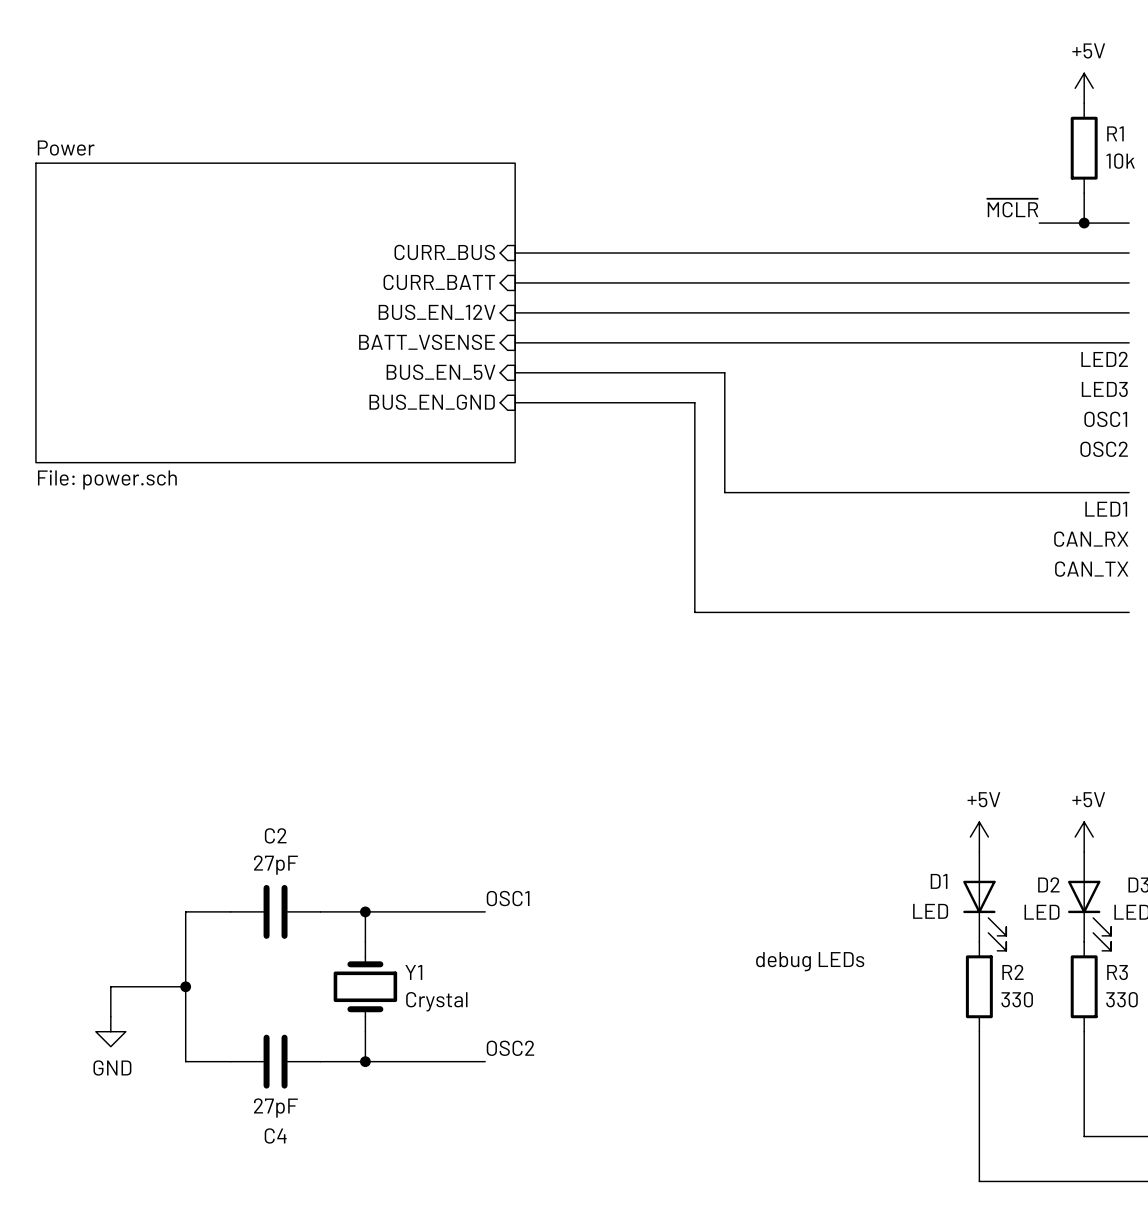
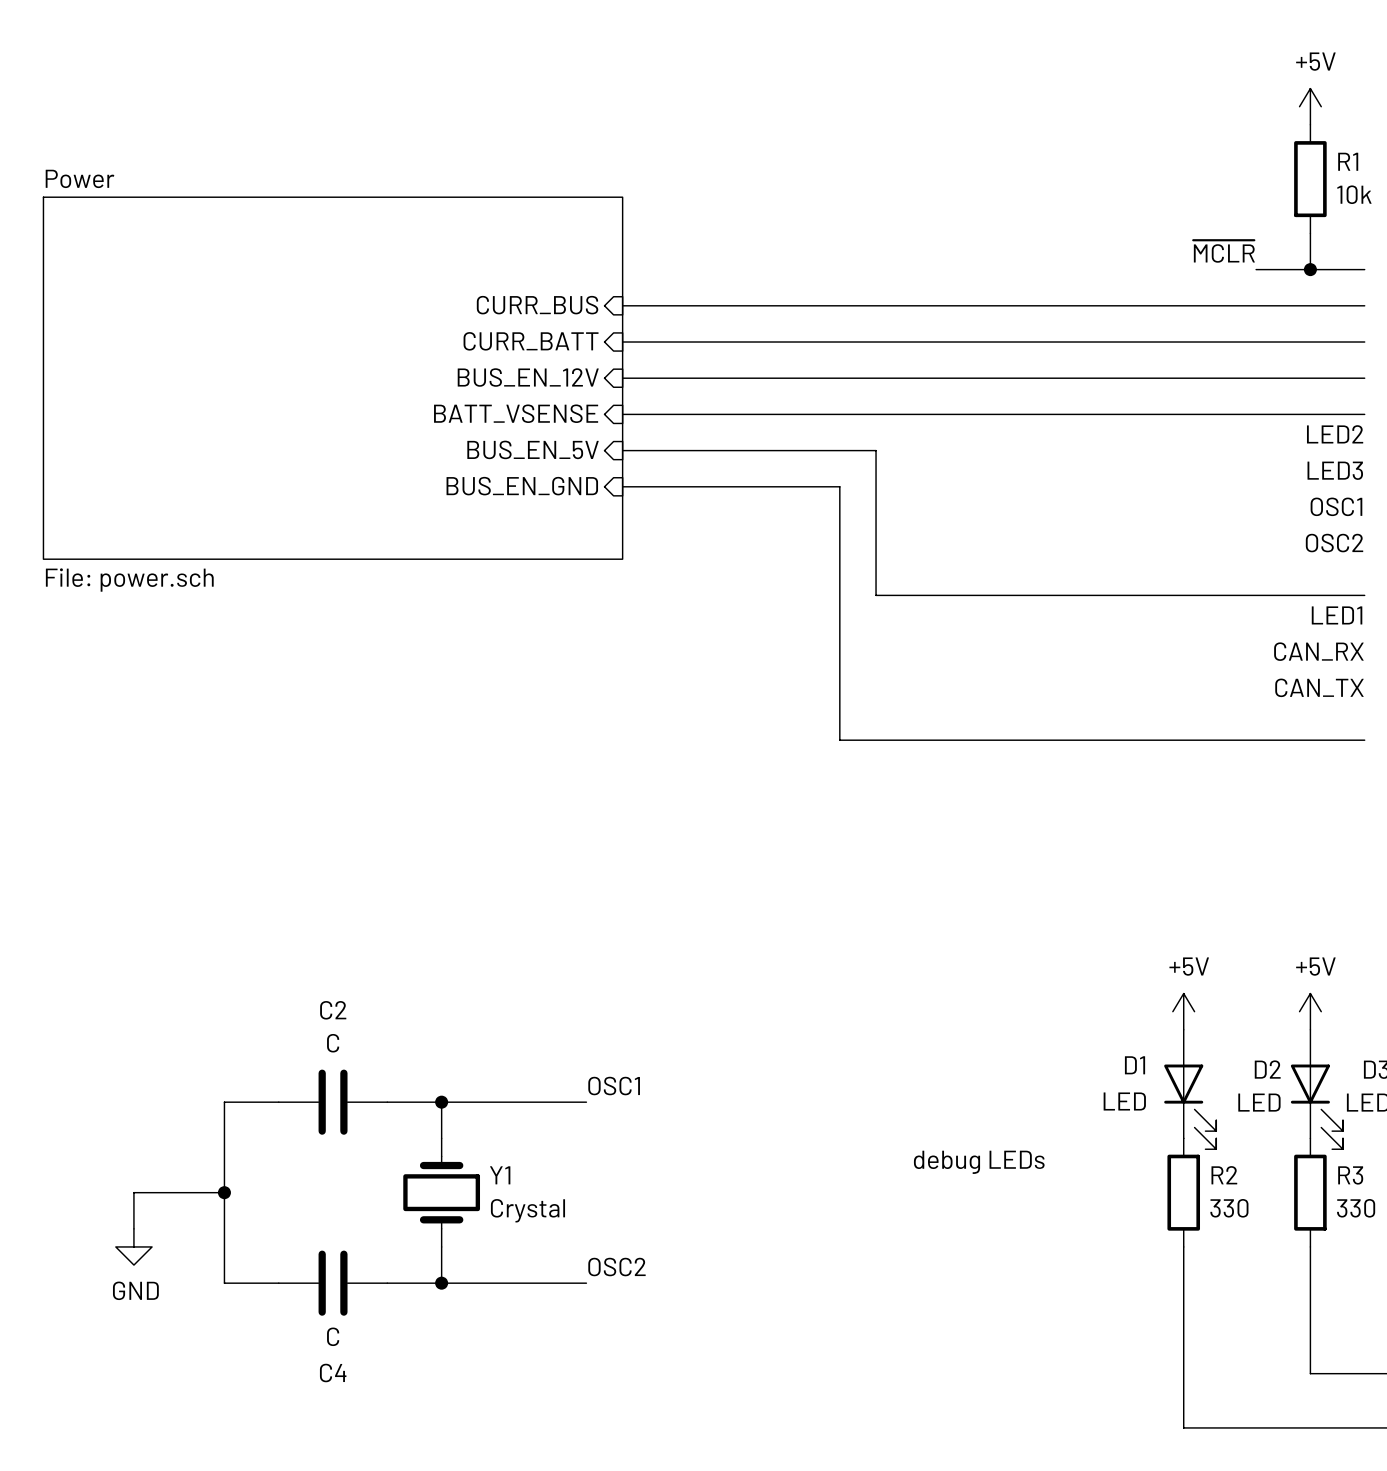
C2 value: 27pF (275, 865) -> C (333, 1043)
C4 value: 27pF (275, 1108) -> C (333, 1336)

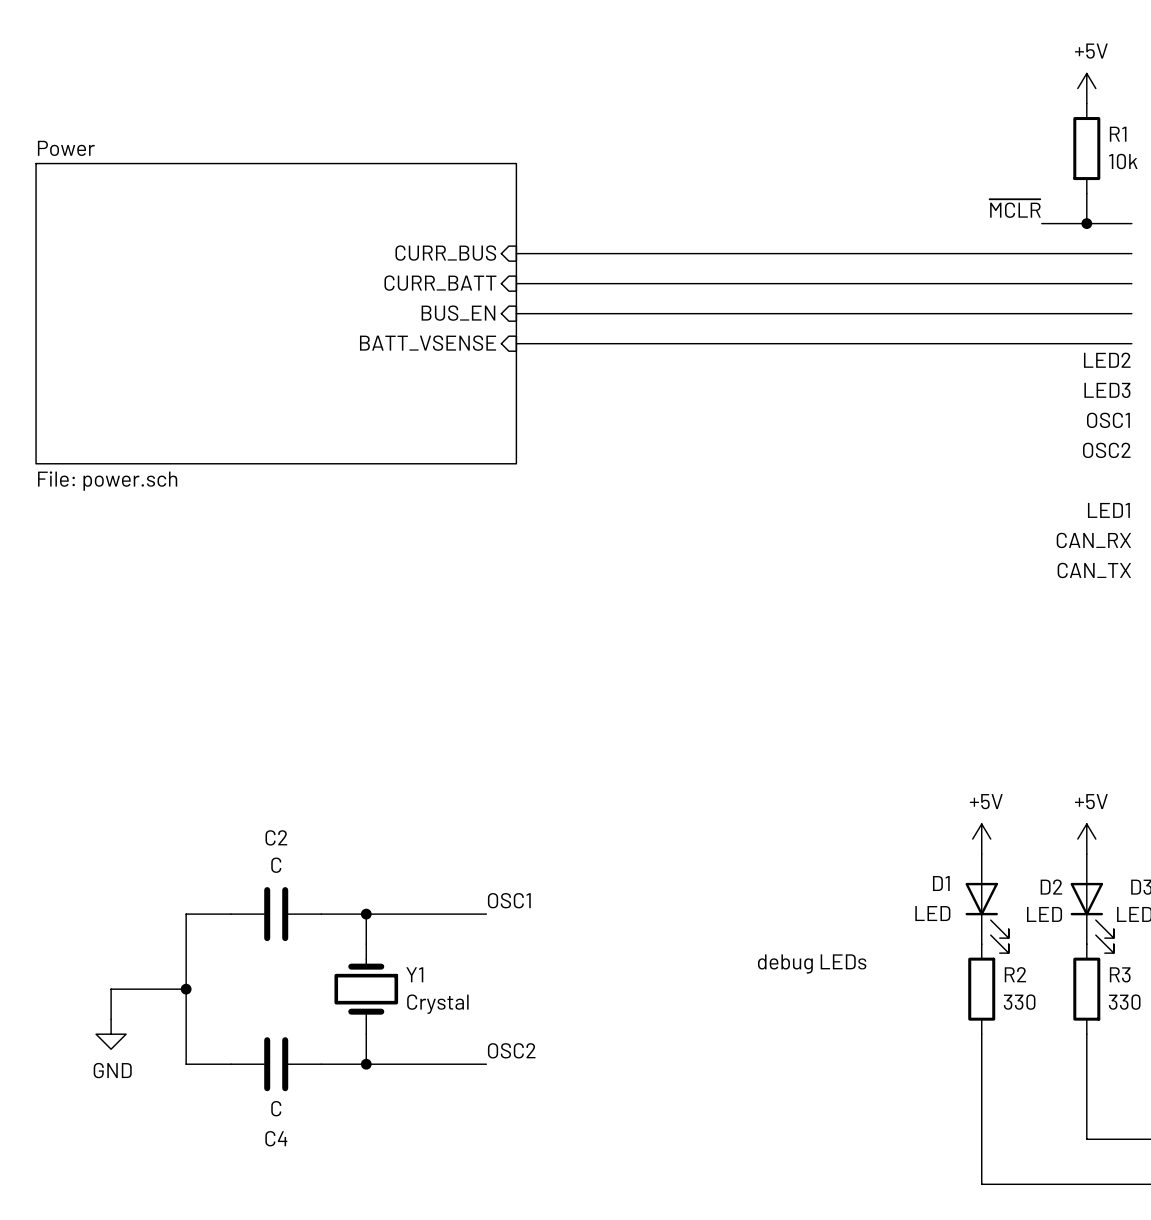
sheet pin: BUS_EN_12V (528, 377) -> BUS_EN (458, 313)
sheet pin: BUS_EN_5V (533, 449) -> none
wire: (622, 450) (876, 450) (876, 595) (1364, 595) -> none
sheet pin: BUS_EN_GND (522, 486) -> none
wire: (622, 486) (839, 486) (839, 740) (1364, 740) -> none

